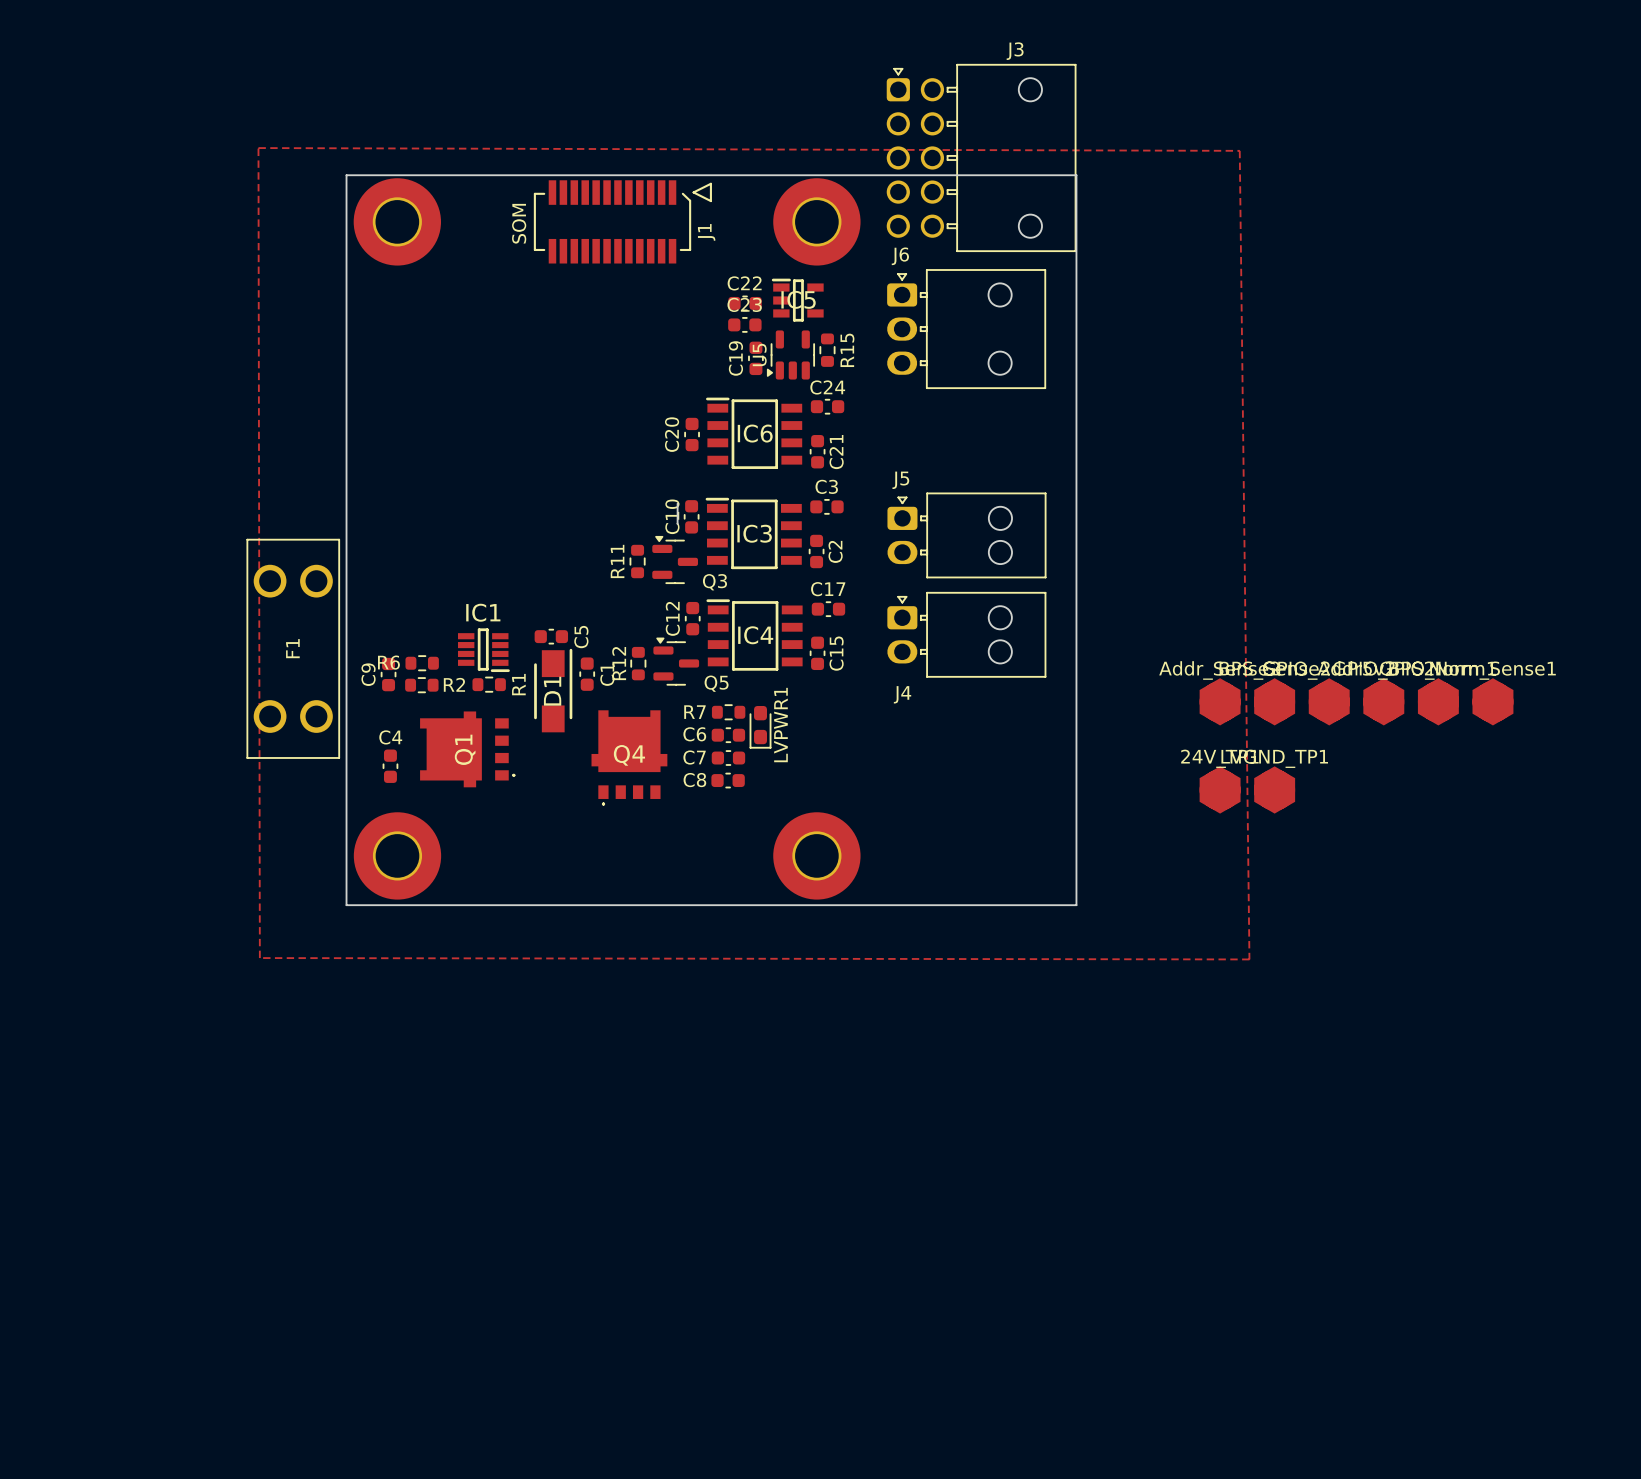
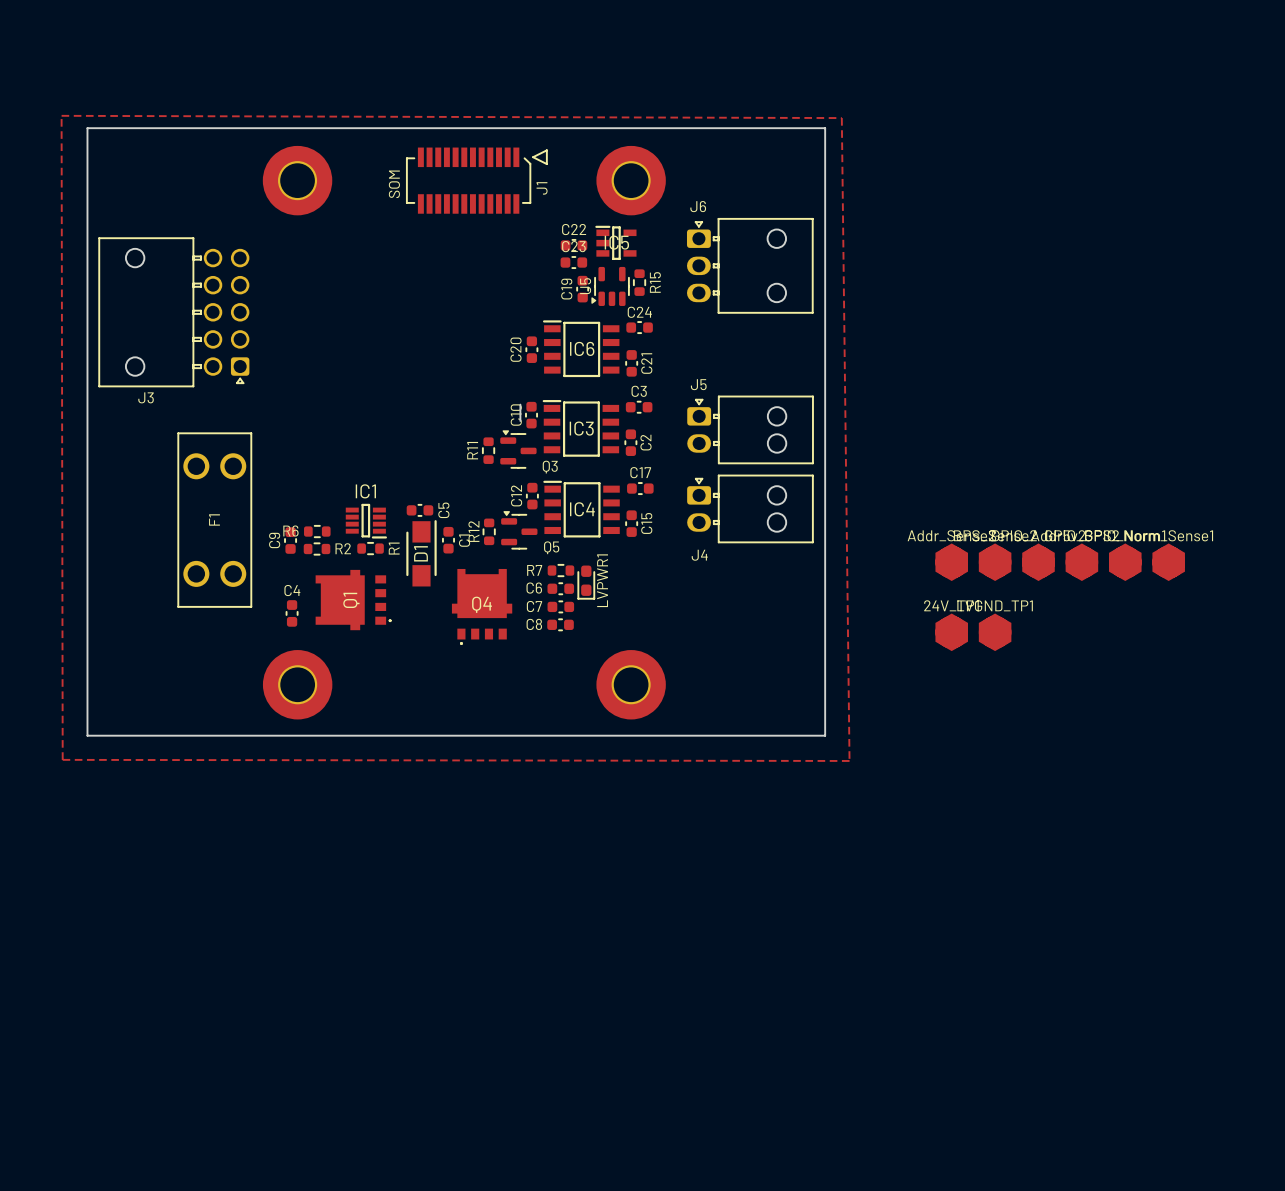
zone outline: (258, 148) (1239, 150) (1249, 959) (259, 958) (258, 148) -> (61, 115) (62, 759) (849, 760) (841, 118) (61, 115)
J3 rotation: 0° (981, 157) -> 180° (173, 312)
J3 position: (981, 157) -> (173, 312)
board edge: (346, 175) (1076, 175) (1076, 905) (346, 905) (346, 175) -> (87, 128) (87, 735) (825, 735) (825, 128) (87, 128)

